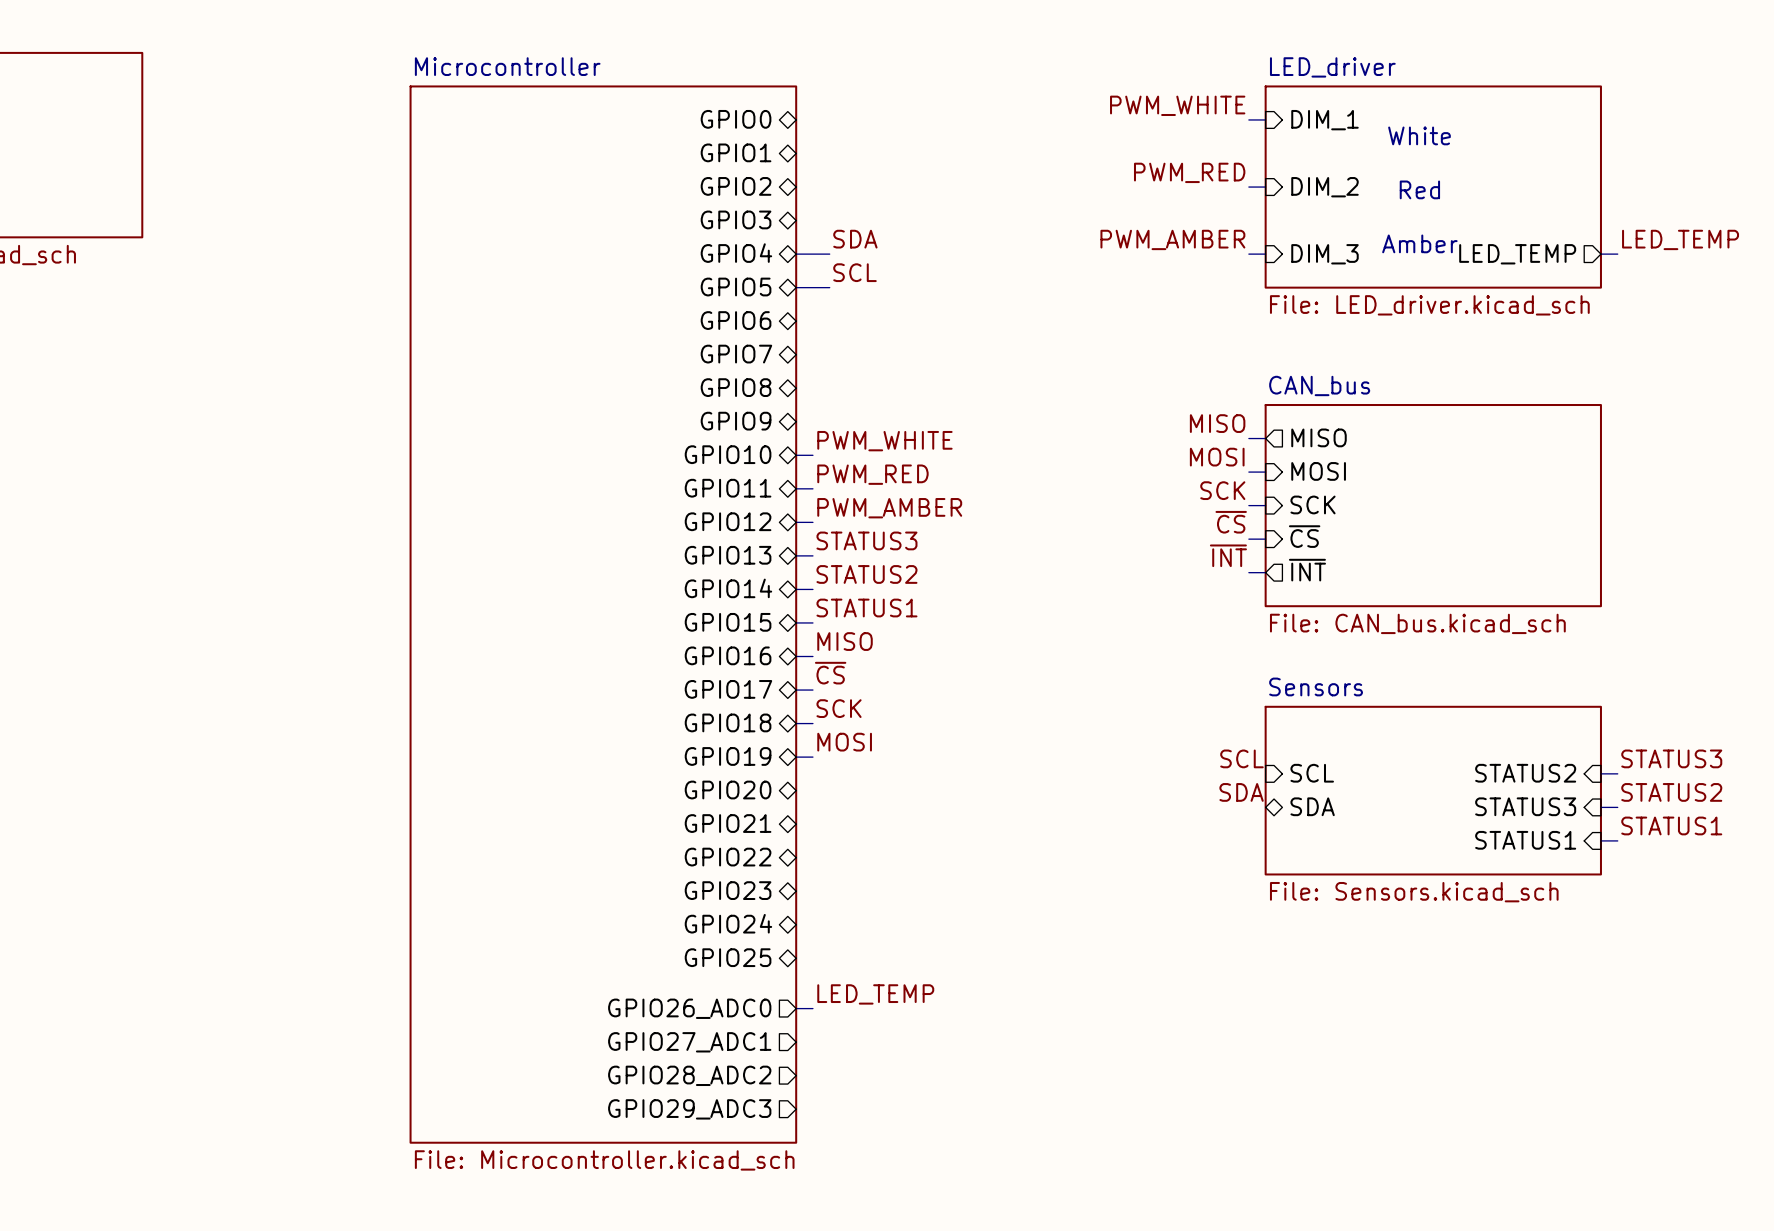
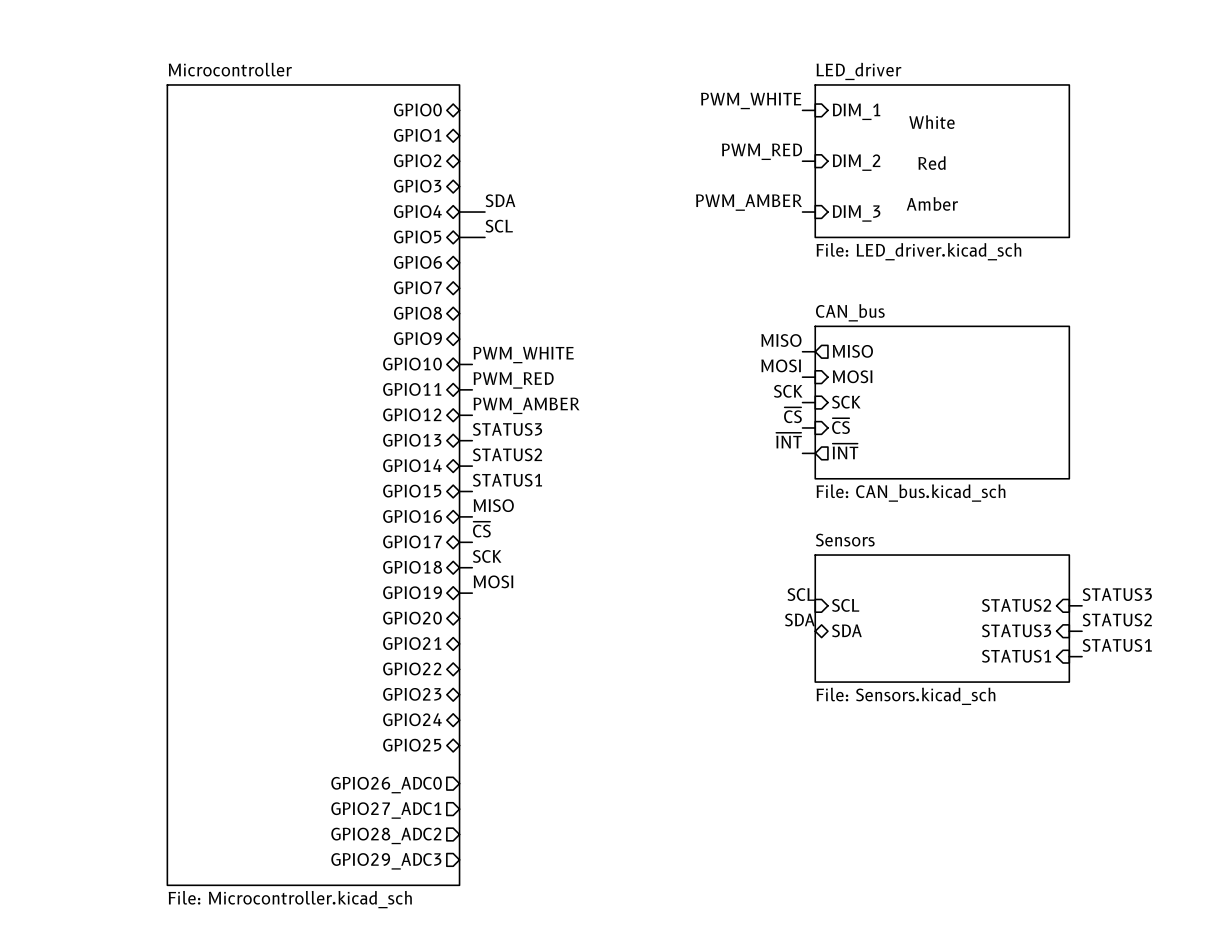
label: LED_TEMP (1680, 239) -> none
sheet pin: LED_TEMP (1517, 254) -> none
wire: (1600, 254) (1617, 254) -> none
label: LED_TEMP (875, 994) -> none
wire: (796, 1008) (812, 1008) -> none

